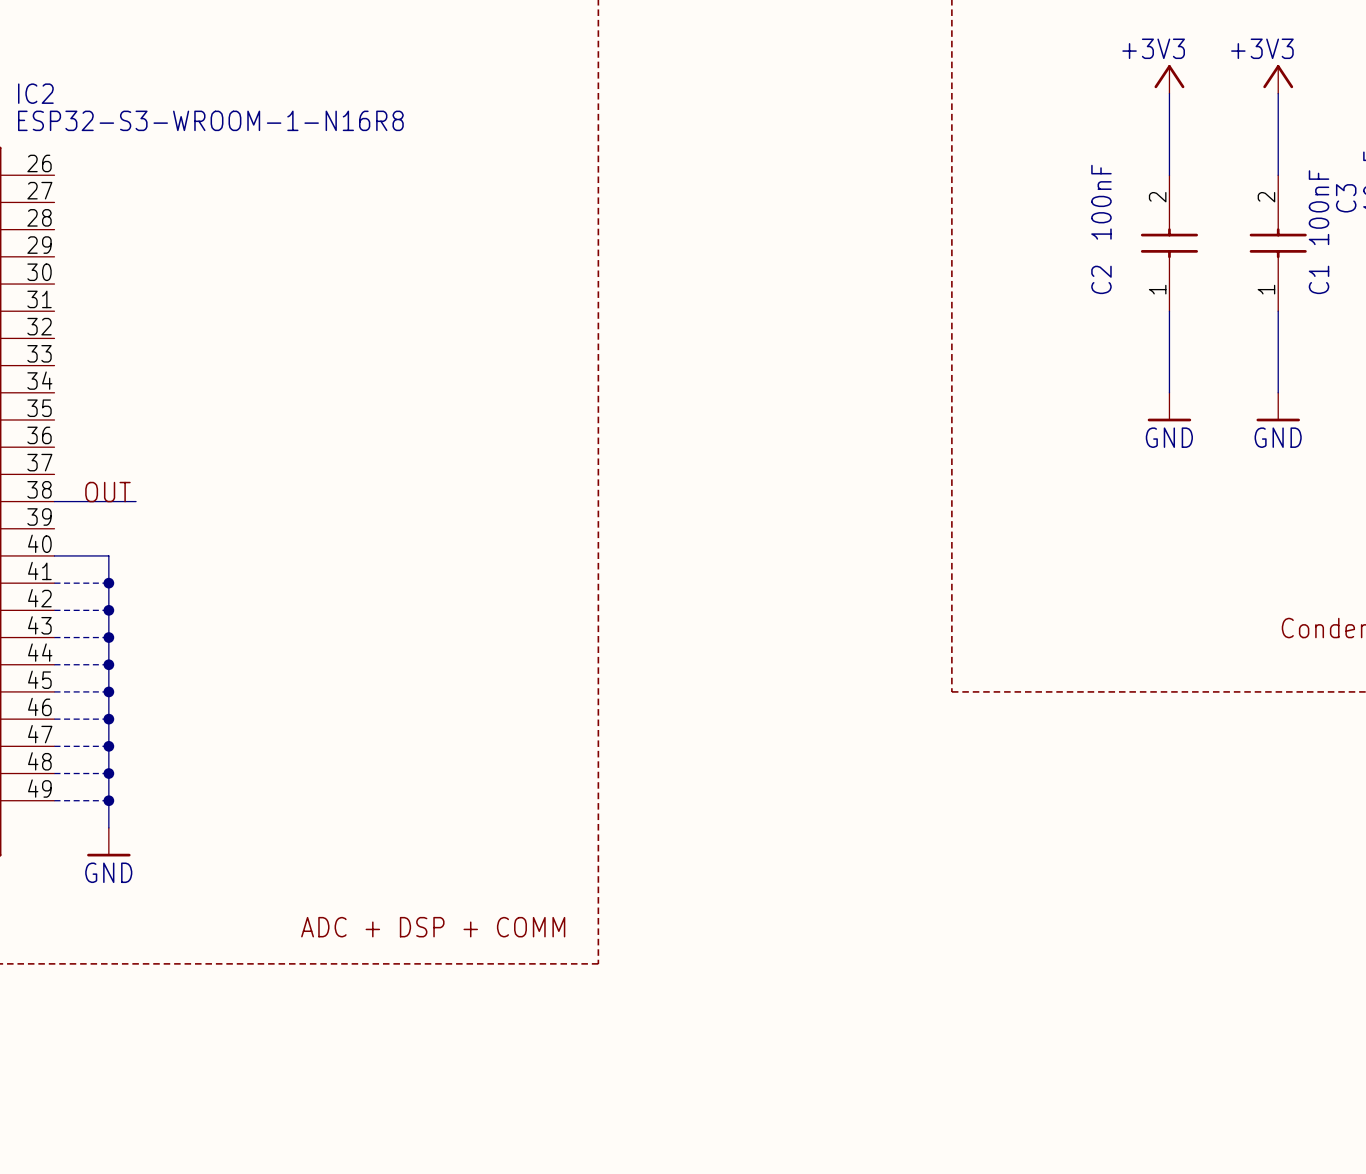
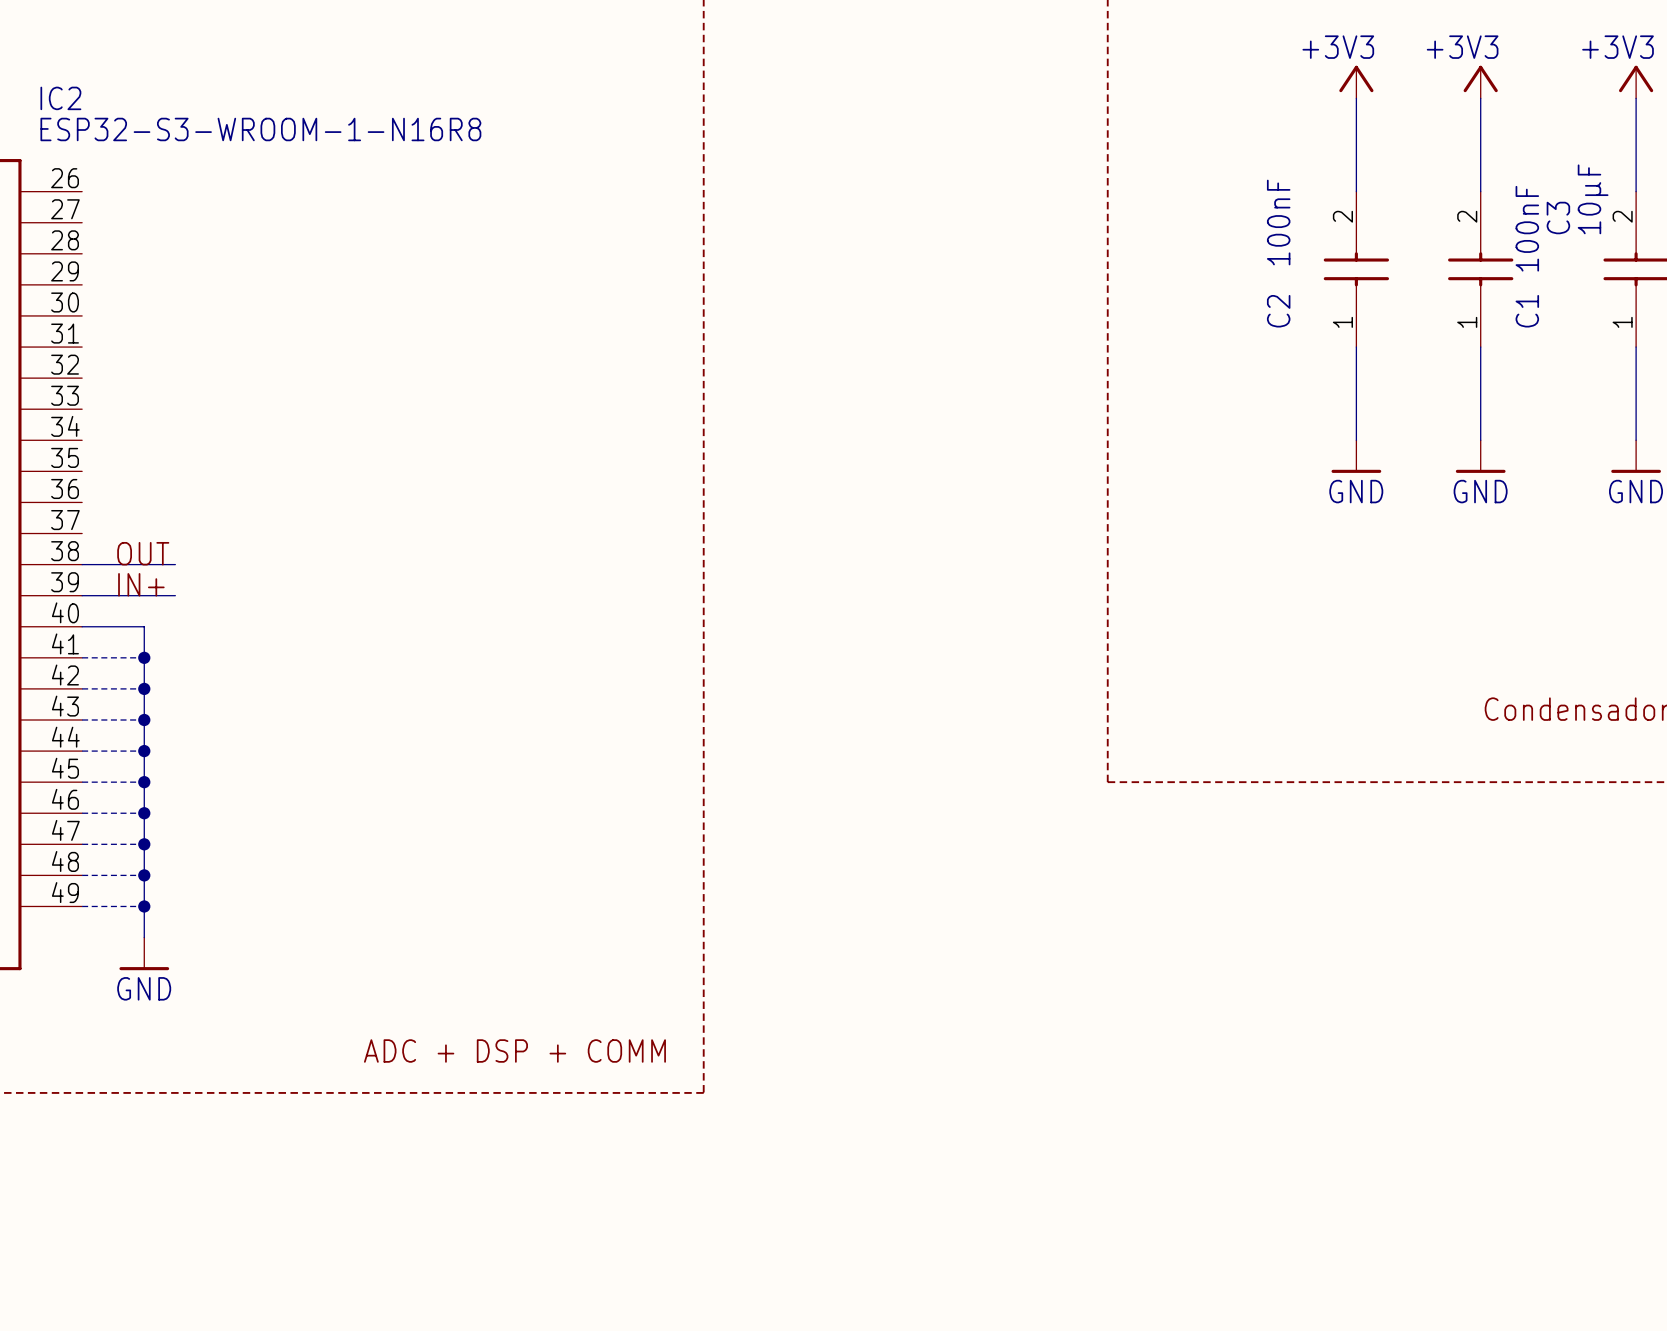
label: none -> IN+ (141, 584)
wire: none -> (82, 595) (175, 595)

